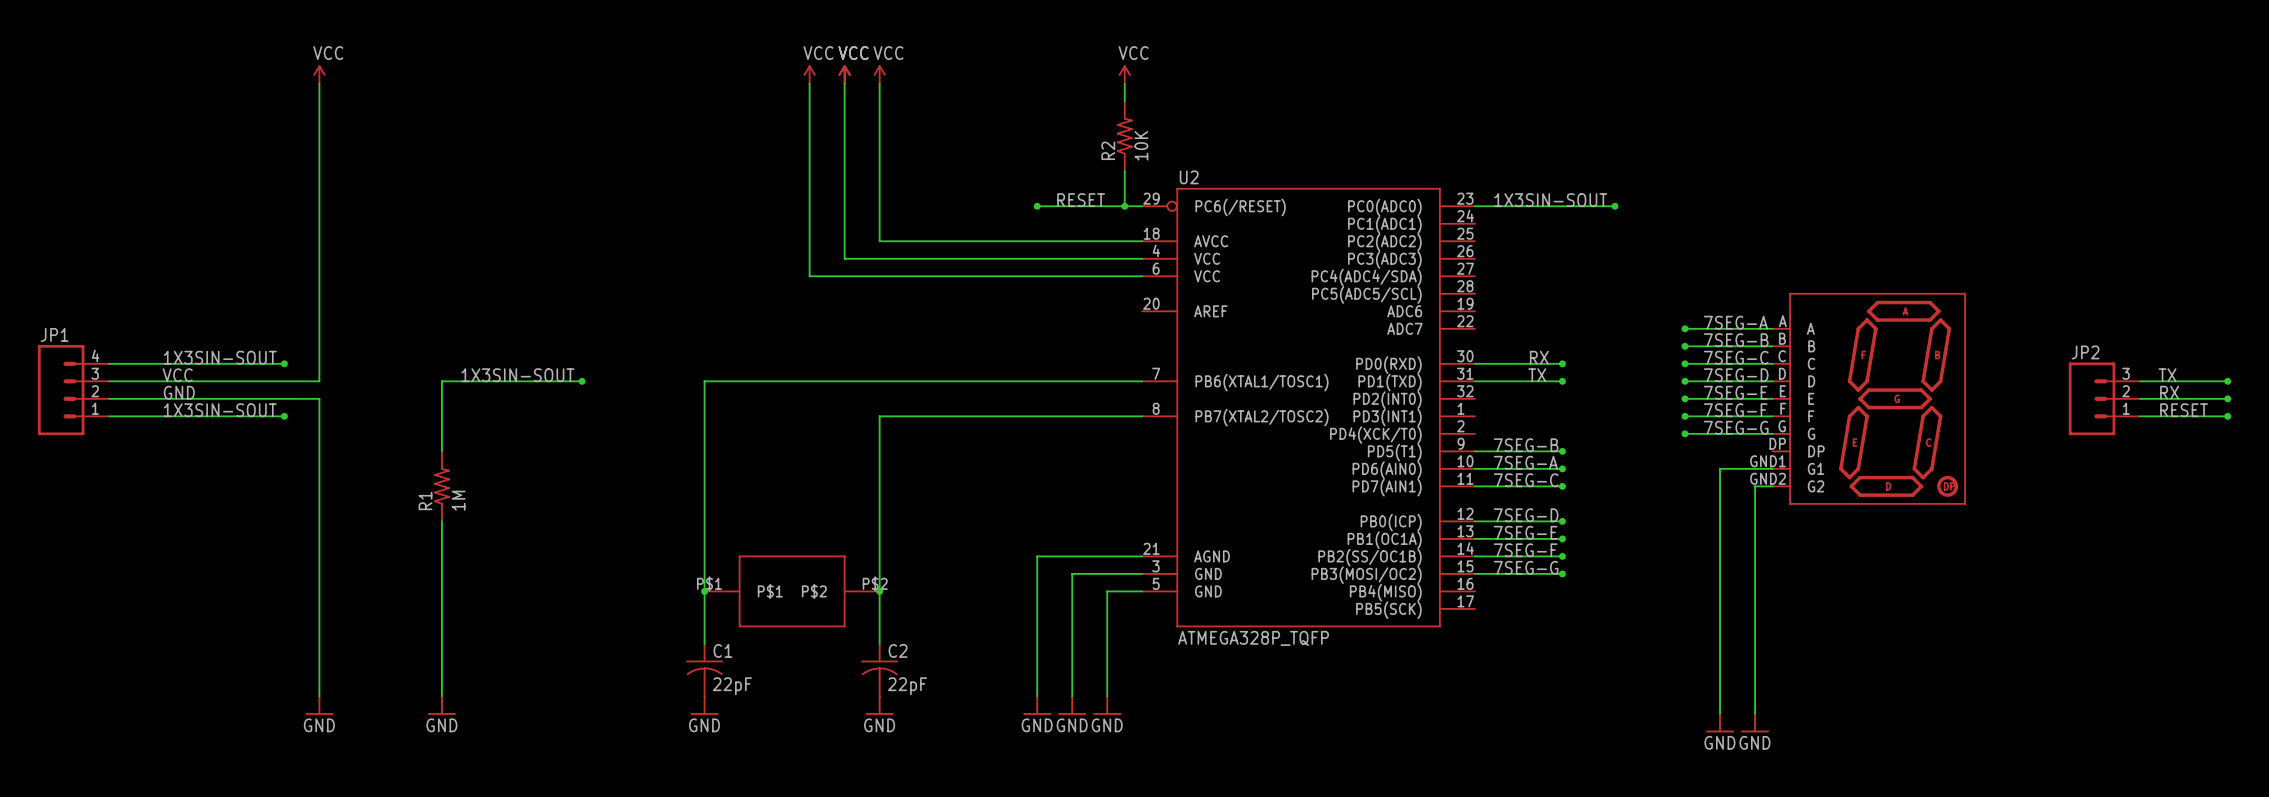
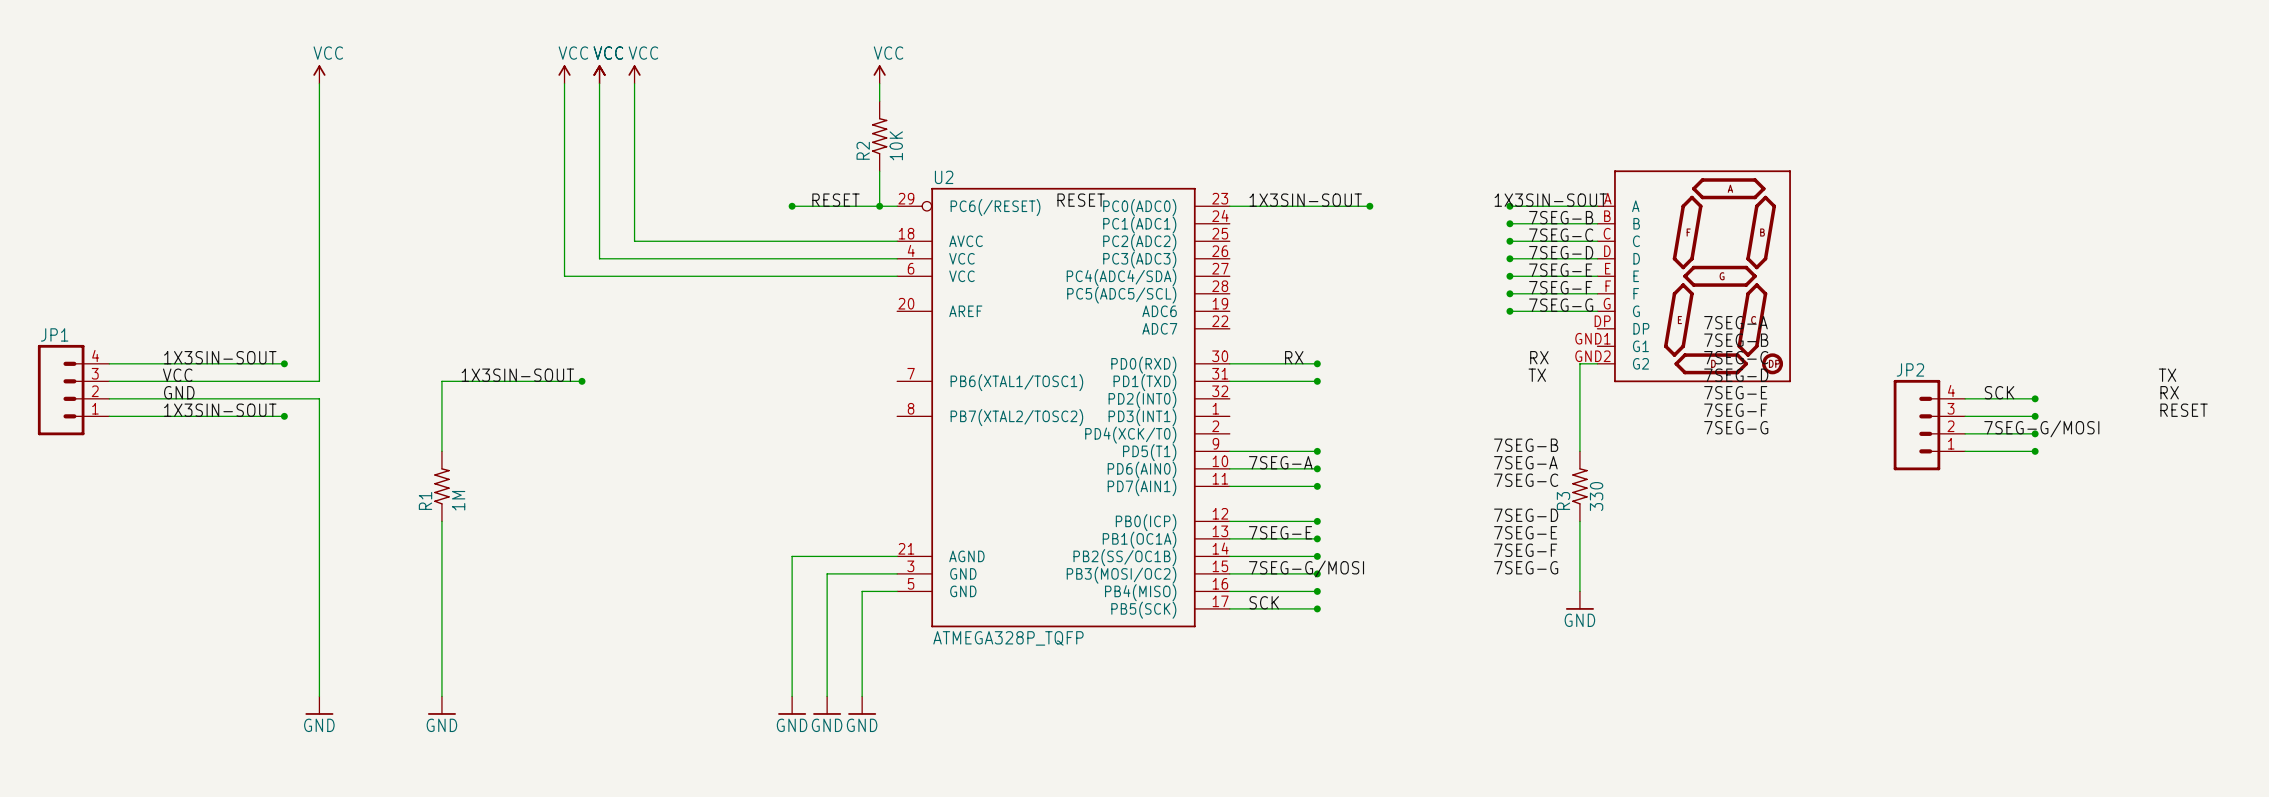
power symbol: none -> VCC (564, 74)
power symbol: none -> VCC (599, 74)
power symbol: none -> VCC (634, 74)
power symbol: VCC (809, 74) -> none
power symbol: VCC (844, 74) -> none
power symbol: VCC (1124, 74) -> none
wire: (809, 83) (809, 276) -> (564, 83) (564, 276) (809, 276)
wire: (844, 83) (844, 258) -> (599, 83) (599, 258) (844, 258)
wire: (1124, 83) (1124, 101) -> none
R2 position: (1124, 136) -> (879, 136)
wire: (1124, 171) (1124, 206) -> none
label: none -> RESET (836, 200)
label: none -> 1X3SIN-SOUT (1305, 200)
wire: none -> (792, 206) (897, 206)
junction: none -> (792, 206)
wire: (879, 206) (879, 241) -> (634, 83) (634, 241) (879, 241)
junction: none -> (879, 206)
wire: (1037, 206) (1142, 206) -> none
junction: (1037, 206) -> none
junction: (1124, 206) -> none
wire: none -> (1229, 206) (1369, 206)
junction: none -> (1369, 206)
wire: (1474, 206) (1509, 206) -> none
junction: none -> (1509, 206)
junction: (1614, 206) -> none
label: none -> 7SEG-B (1561, 217)
junction: none -> (1509, 223)
label: none -> 7SEG-C (1561, 235)
wire: (897, 241) (1142, 241) -> none
junction: none -> (1509, 241)
label: none -> 7SEG-D (1561, 252)
wire: (897, 258) (1142, 258) -> none
wire: none -> (1509, 258) (1597, 258)
junction: none -> (1509, 258)
label: none -> 7SEG-E (1560, 270)
wire: (897, 276) (1142, 276) -> none
wire: none -> (1509, 276) (1597, 276)
junction: none -> (1509, 276)
part: none -> (1694, 276)
label: none -> 7SEG-F (1560, 287)
wire: none -> (1509, 293) (1597, 293)
junction: none -> (1509, 293)
label: none -> 7SEG-G (1561, 305)
junction: none -> (1509, 311)
wire: (1684, 328) (1772, 328) -> none
junction: (1684, 328) -> none
wire: (1684, 346) (1772, 346) -> none
junction: (1684, 346) -> none
label: none -> RX (1294, 357)
JP2 symbol: [2068, 362, 2141, 436] -> [1893, 379, 1966, 471]
wire: none -> (1229, 363) (1317, 363)
junction: none -> (1317, 363)
wire: (1474, 363) (1562, 363) -> (1509, 223) (1597, 223)
junction: (1562, 363) -> none
wire: none -> (1597, 363) (1579, 363) (1579, 451)
wire: (1684, 363) (1772, 363) -> none
junction: (1684, 363) -> none
wire: (1142, 381) (704, 381) (704, 643) -> none
wire: none -> (1229, 381) (1317, 381)
junction: none -> (1317, 381)
wire: (1474, 381) (1562, 381) -> (1509, 241) (1597, 241)
junction: (1562, 381) -> none
junction: (1684, 381) -> none
wire: (2140, 381) (2227, 381) -> none
junction: (2227, 381) -> none
label: none -> SCK (1999, 392)
wire: (1684, 398) (1772, 398) -> none
junction: (1684, 398) -> none
part: (1869, 398) -> none
wire: none -> (1965, 398) (2035, 398)
junction: none -> (2035, 398)
wire: (2140, 398) (2227, 398) -> none
junction: (2227, 398) -> none
U2 position: (1308, 407) -> (1063, 407)
wire: (1142, 416) (879, 416) (879, 643) -> none
wire: (1684, 416) (1772, 416) -> none
junction: (1684, 416) -> none
wire: none -> (1965, 416) (2035, 416)
junction: none -> (2035, 416)
wire: (2140, 416) (2227, 416) -> none
junction: (2227, 416) -> none
label: none -> 7SEG-G/MOSI (2041, 428)
wire: (1684, 433) (1772, 433) -> none
junction: (1684, 433) -> none
wire: none -> (1965, 433) (2035, 433)
junction: none -> (2035, 433)
wire: none -> (1229, 451) (1317, 451)
junction: none -> (1317, 451)
wire: (1474, 451) (1562, 451) -> (1509, 311) (1597, 311)
junction: (1562, 451) -> none
wire: none -> (1965, 451) (2035, 451)
junction: none -> (2035, 451)
label: none -> 7SEG-A (1280, 462)
wire: none -> (1229, 468) (1317, 468)
junction: none -> (1317, 468)
wire: (1474, 468) (1562, 468) -> none
junction: (1562, 468) -> none
wire: (1772, 468) (1720, 468) (1720, 713) -> none
wire: none -> (1229, 486) (1317, 486)
junction: none -> (1317, 486)
wire: (1474, 486) (1562, 486) -> none
junction: (1562, 486) -> none
R3: none -> 330 (1579, 486)
wire: (1772, 486) (1755, 486) (1755, 713) -> none
wire: none -> (1229, 521) (1317, 521)
junction: none -> (1317, 521)
wire: (1474, 521) (1562, 521) -> none
junction: (1562, 521) -> none
wire: none -> (1579, 521) (1579, 591)
label: none -> 7SEG-E (1280, 532)
wire: none -> (1229, 538) (1317, 538)
junction: none -> (1317, 538)
wire: (1474, 538) (1562, 538) -> none
junction: (1562, 538) -> none
wire: none -> (897, 556) (792, 556) (792, 696)
wire: (1142, 556) (1037, 556) (1037, 696) -> none
wire: none -> (1229, 556) (1317, 556)
junction: none -> (1317, 556)
wire: (1474, 556) (1562, 556) -> none
junction: (1562, 556) -> none
label: none -> 7SEG-G/MOSI (1306, 568)
wire: none -> (897, 573) (827, 573) (827, 696)
wire: (1142, 573) (1072, 573) (1072, 696) -> none
wire: none -> (1229, 573) (1317, 573)
junction: none -> (1317, 573)
wire: (1474, 573) (1562, 573) -> none
junction: (1562, 573) -> none
junction: (704, 591) -> none
part: (792, 591) -> none
junction: (879, 591) -> none
wire: none -> (897, 591) (862, 591) (862, 696)
wire: (1142, 591) (1107, 591) (1107, 696) -> none
wire: none -> (1229, 591) (1317, 591)
junction: none -> (1317, 591)
power symbol: none -> GND (1579, 600)
label: none -> SCK (1264, 602)
wire: none -> (1229, 608) (1317, 608)
junction: none -> (1317, 608)
C1: 22pF (704, 670) -> none
C2: 22pF (879, 670) -> none
power symbol: GND (704, 705) -> none
power symbol: none -> GND (792, 705)
power symbol: none -> GND (827, 705)
power symbol position: GND (879, 705) -> GND (862, 705)
power symbol: GND (1037, 705) -> none
power symbol: GND (1072, 705) -> none
power symbol: GND (1107, 705) -> none
power symbol: GND (1720, 723) -> none
power symbol: GND (1755, 723) -> none

